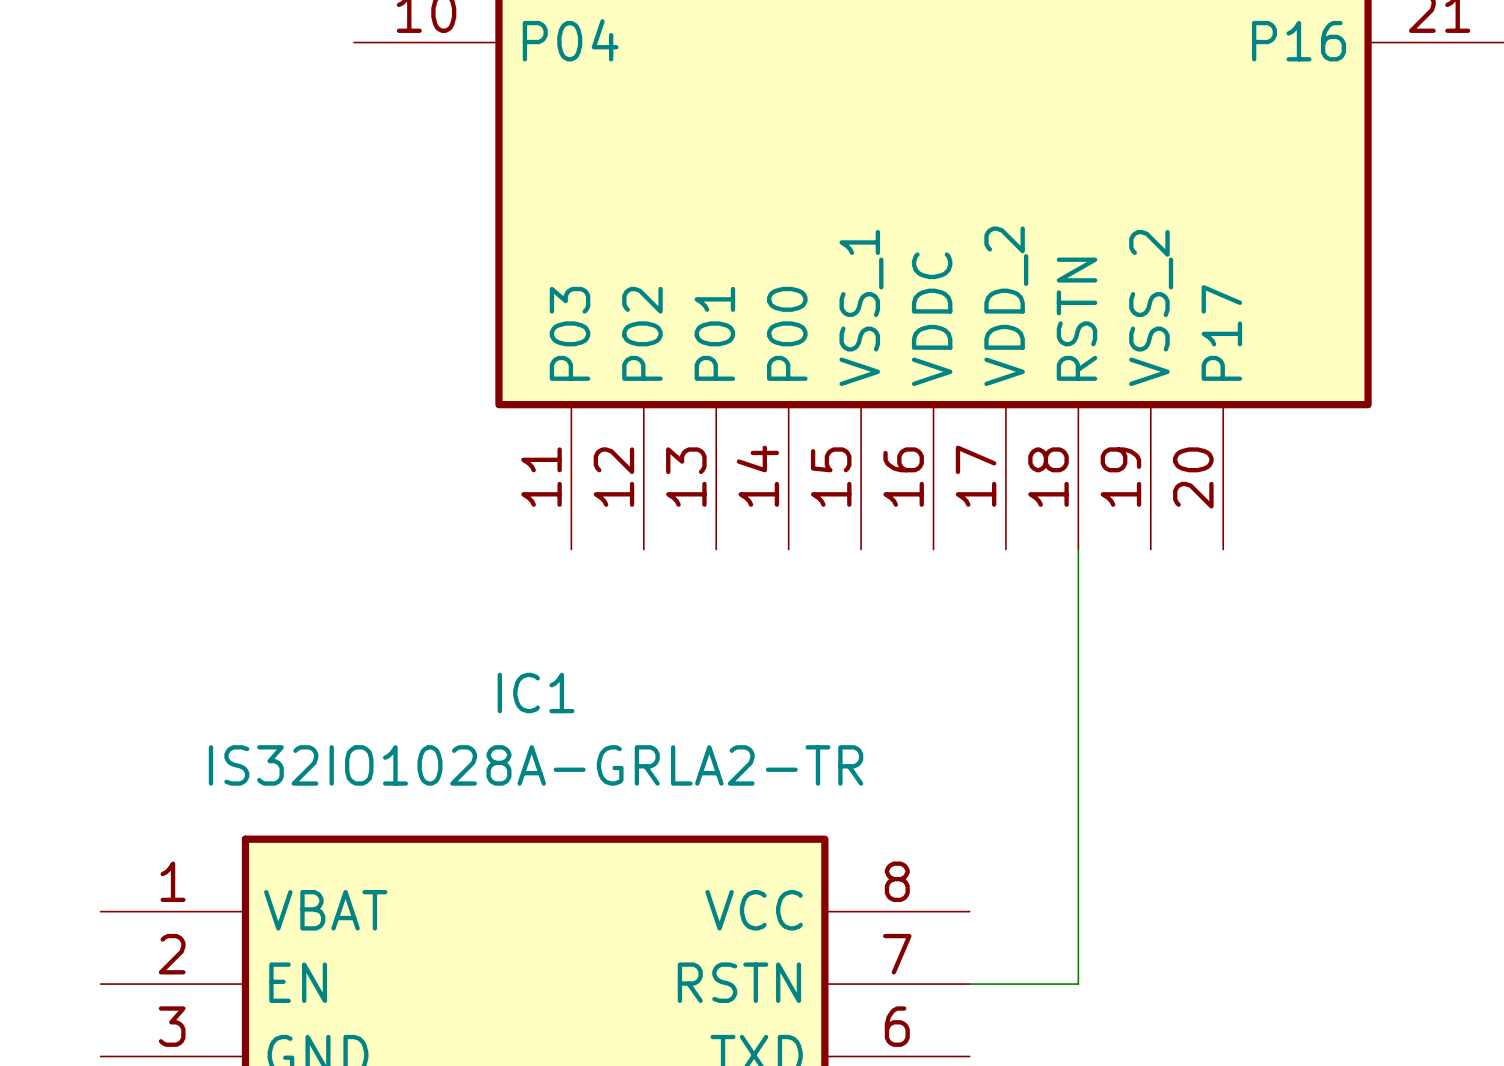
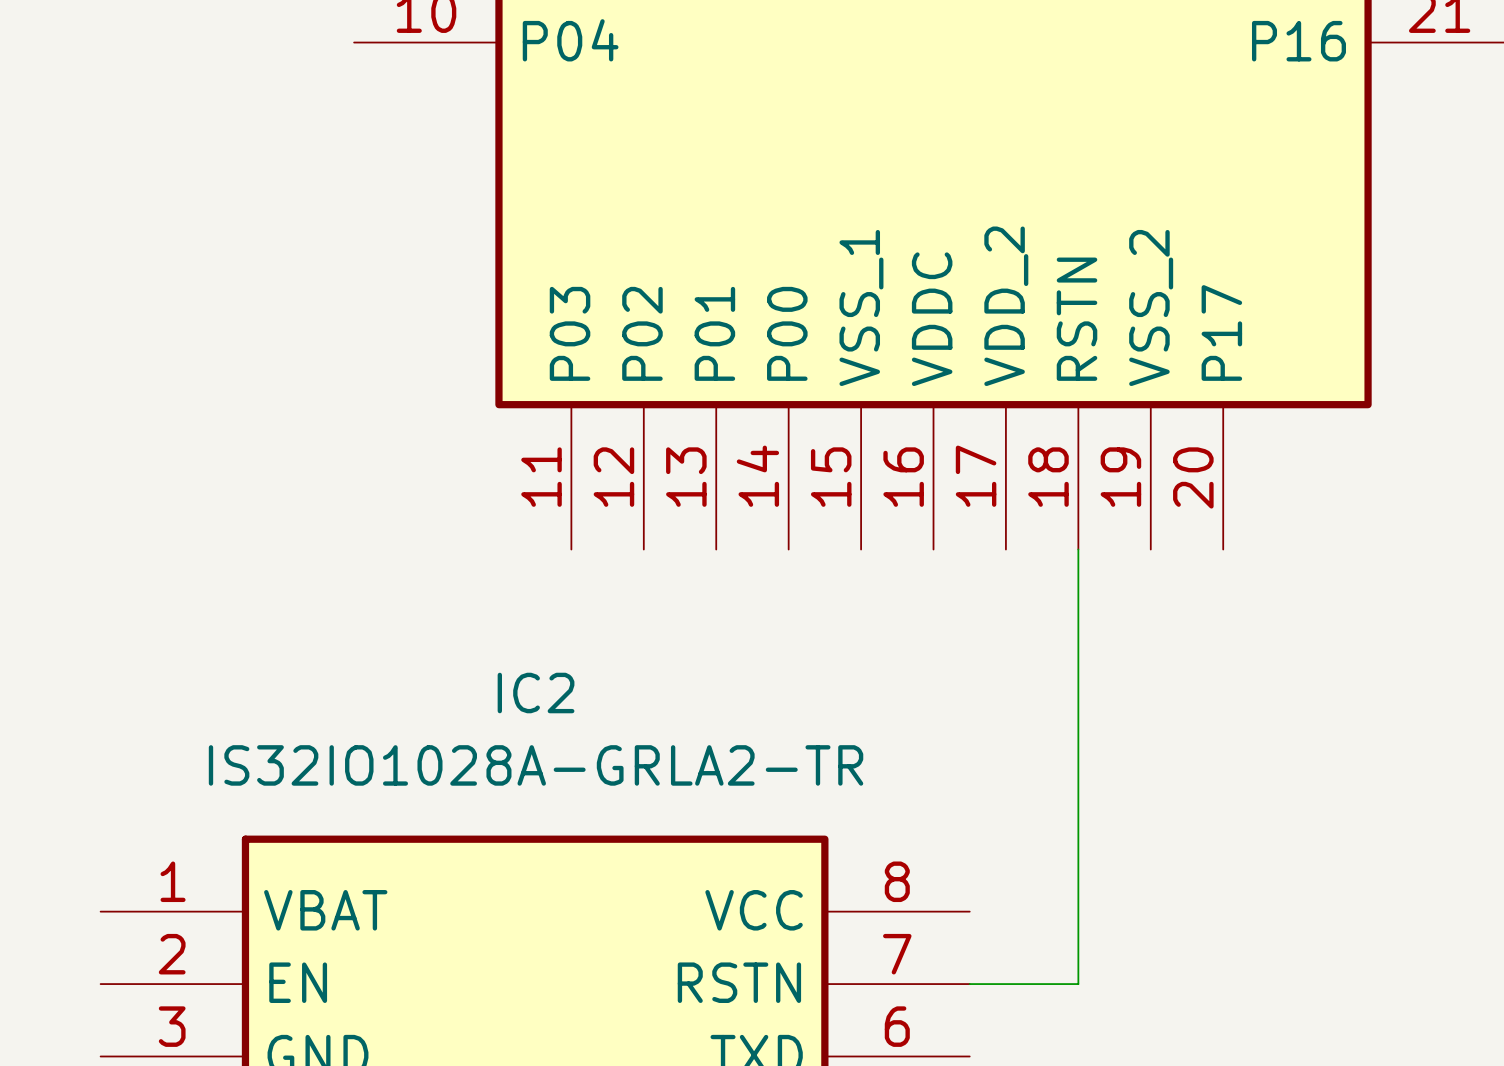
IC1 name: IC1 (536, 693) -> IC2 (536, 693)

